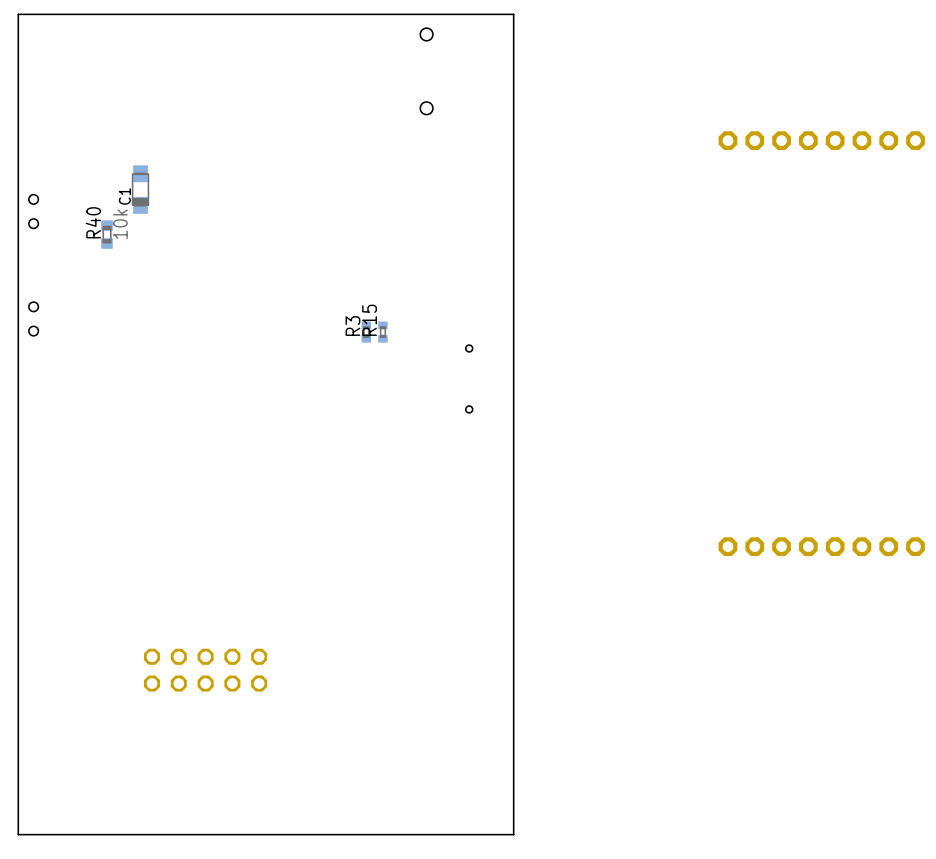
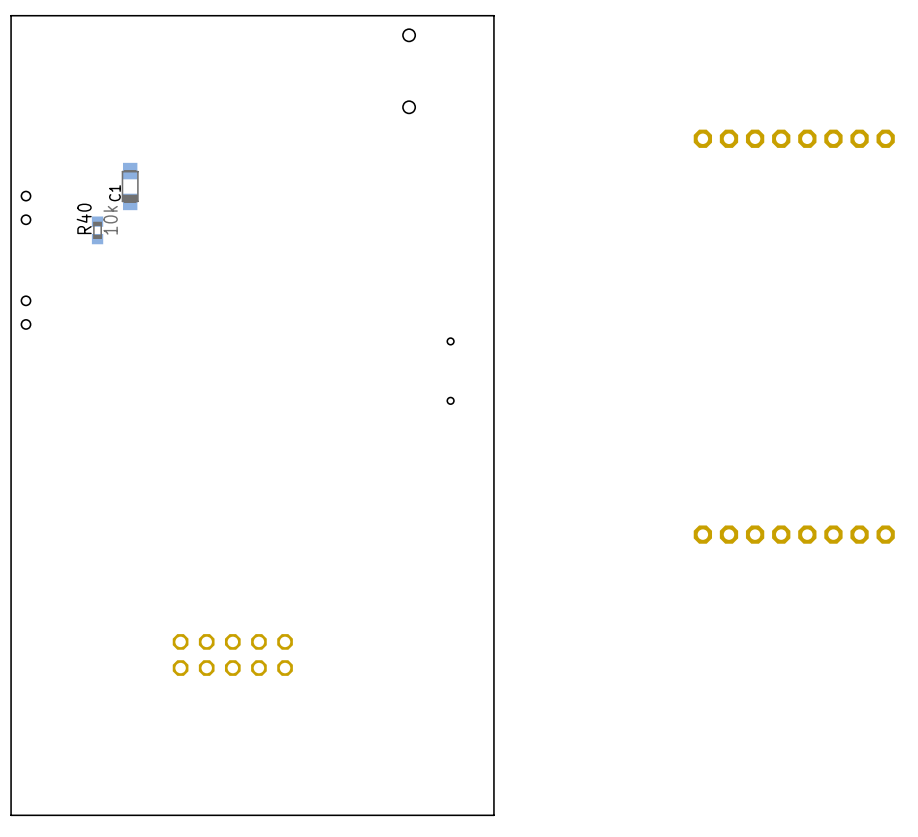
R3: (366, 332) -> none
R15: (382, 332) -> none
part position: (205, 670) -> (232, 654)

